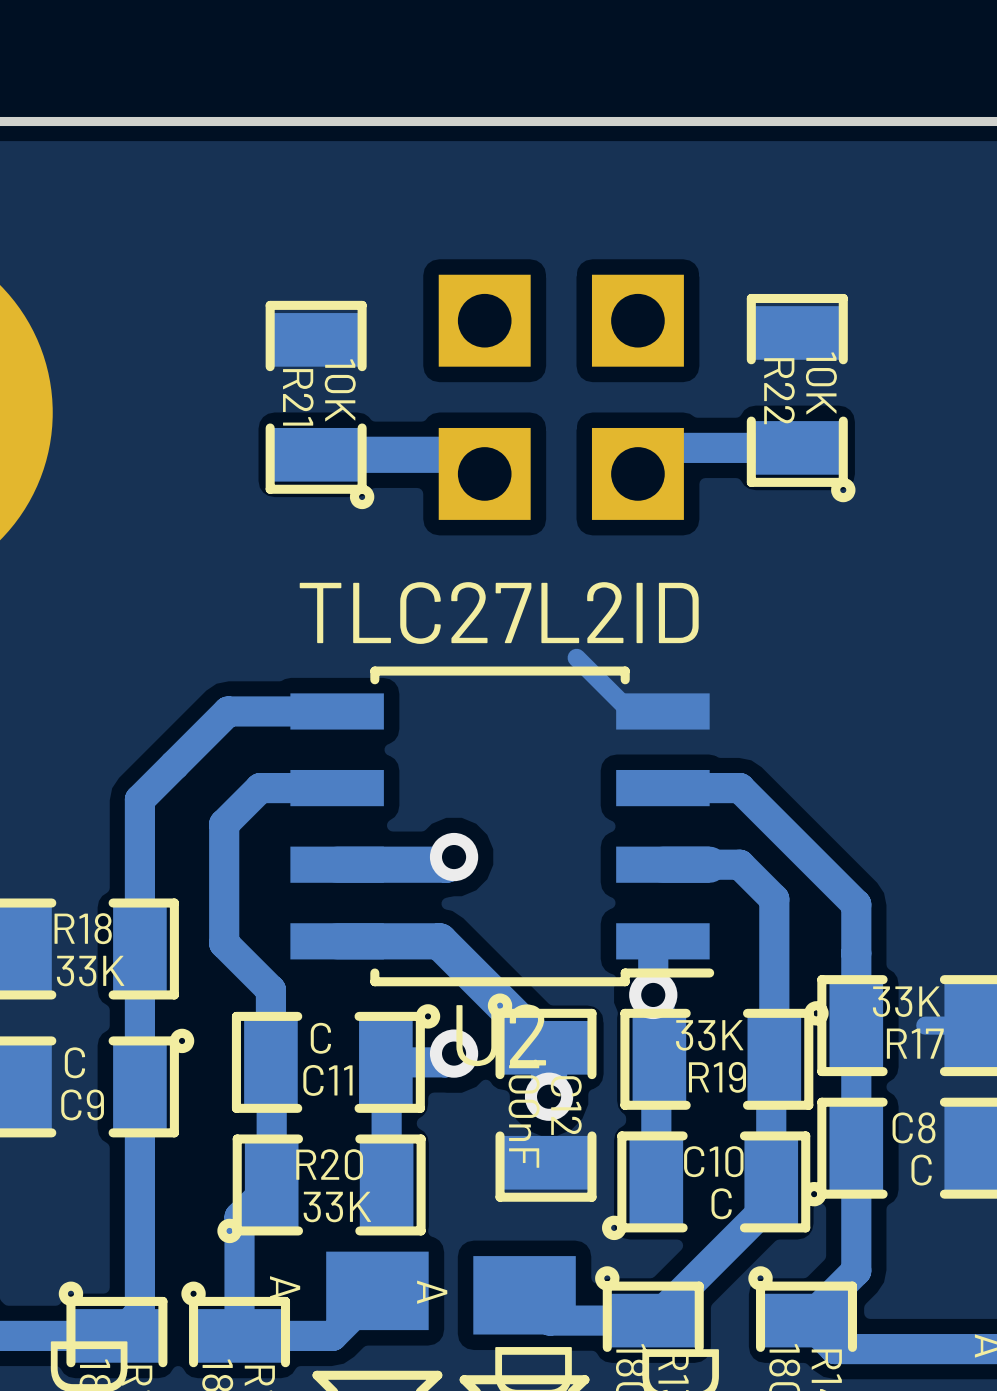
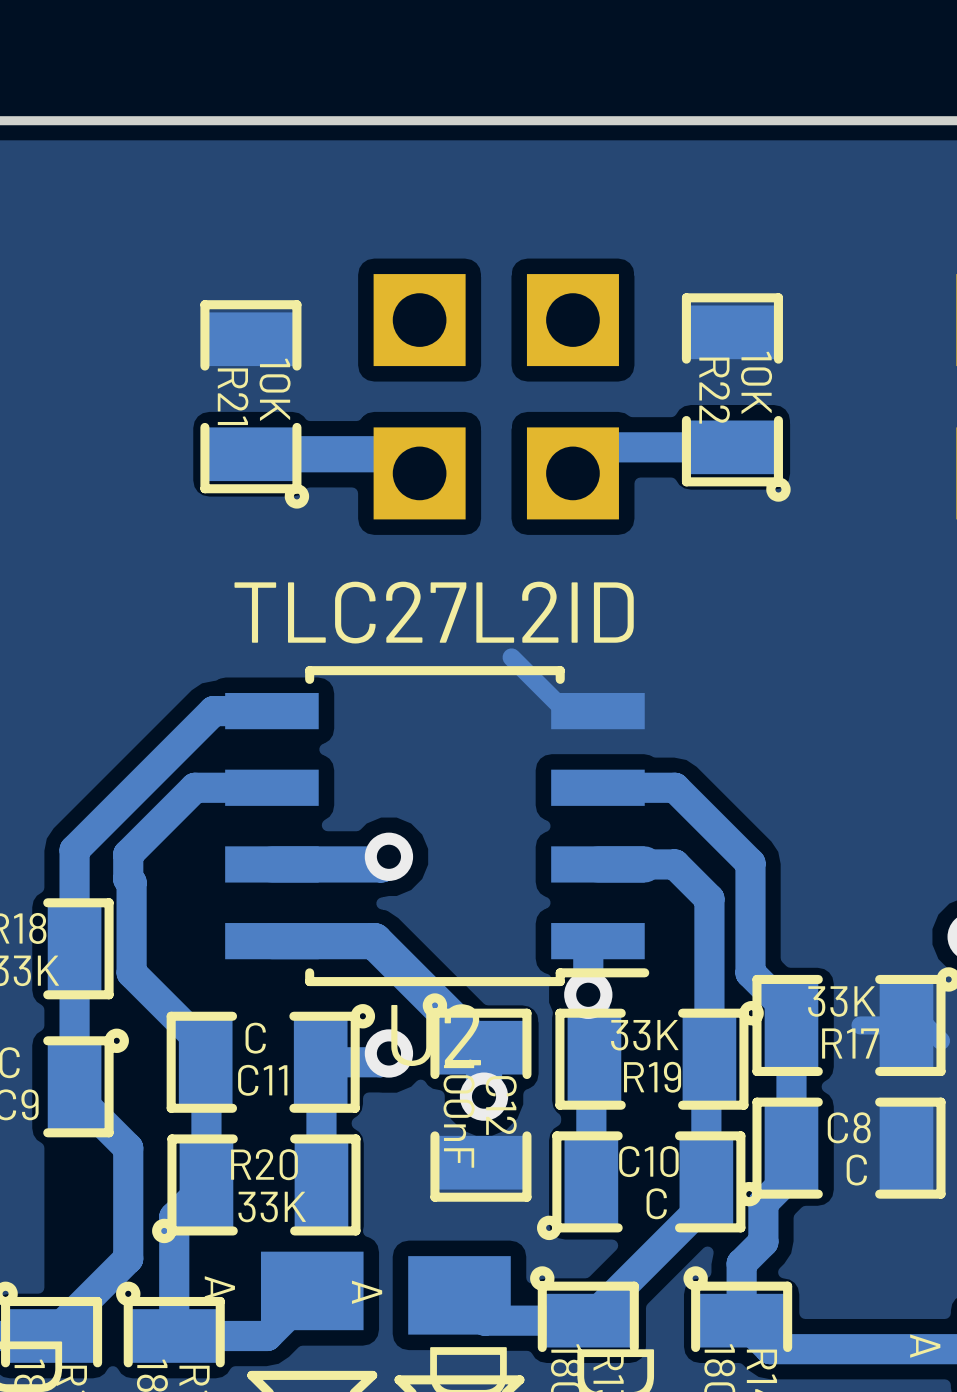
track: (278, 711) (228, 711) (139, 799) (139, 850) -> (213, 711) (74, 850)
track: (224, 824) (224, 943) (270, 990) (270, 1047) -> (158, 823) (128, 854) (128, 879) (131, 882) (131, 972) (205, 1046)
track: (815, 863) (856, 904) (856, 1014) -> (750, 863) (750, 972) (791, 1013)
track: (139, 1094) (139, 1312) (116, 1335) -> (74, 1094) (128, 1148) (128, 1258) (63, 1323) (63, 1336) (51, 1336)
track: (856, 1175) (856, 1270) (806, 1320) -> (791, 1174) (763, 1203) (763, 1241) (741, 1263) (741, 1320)

